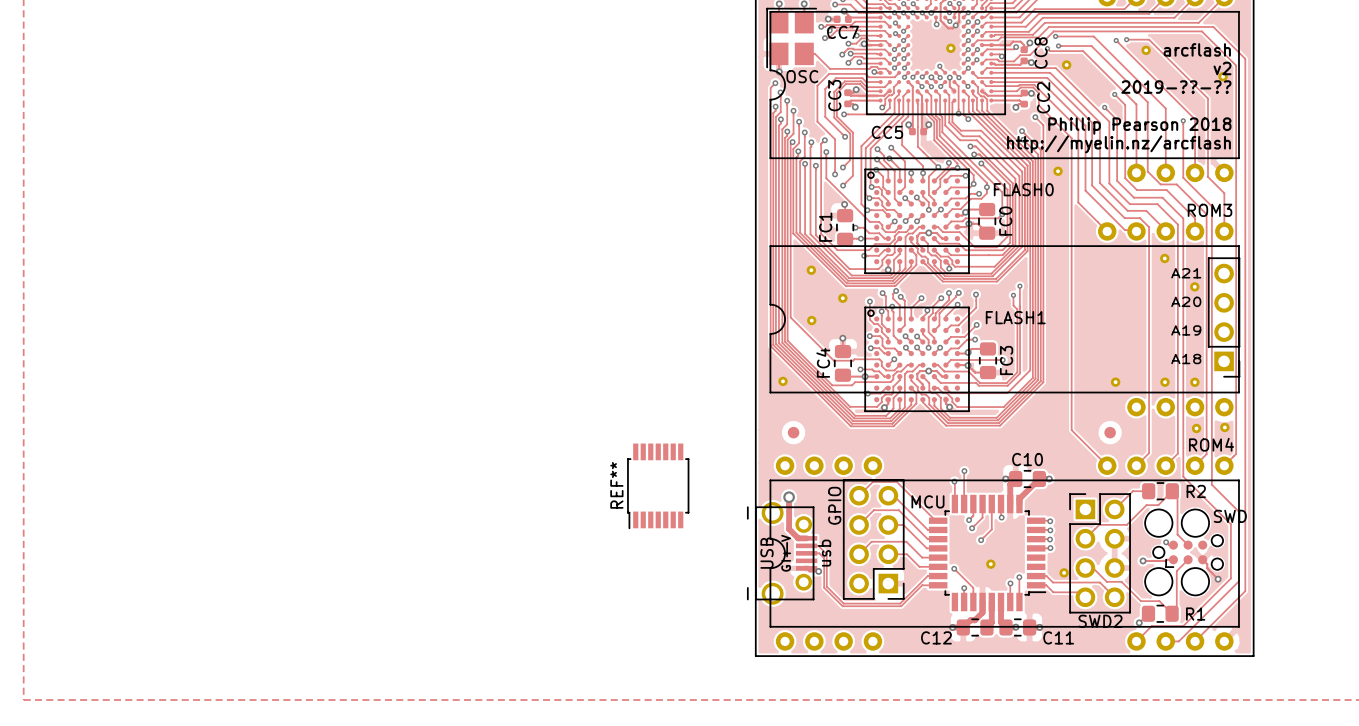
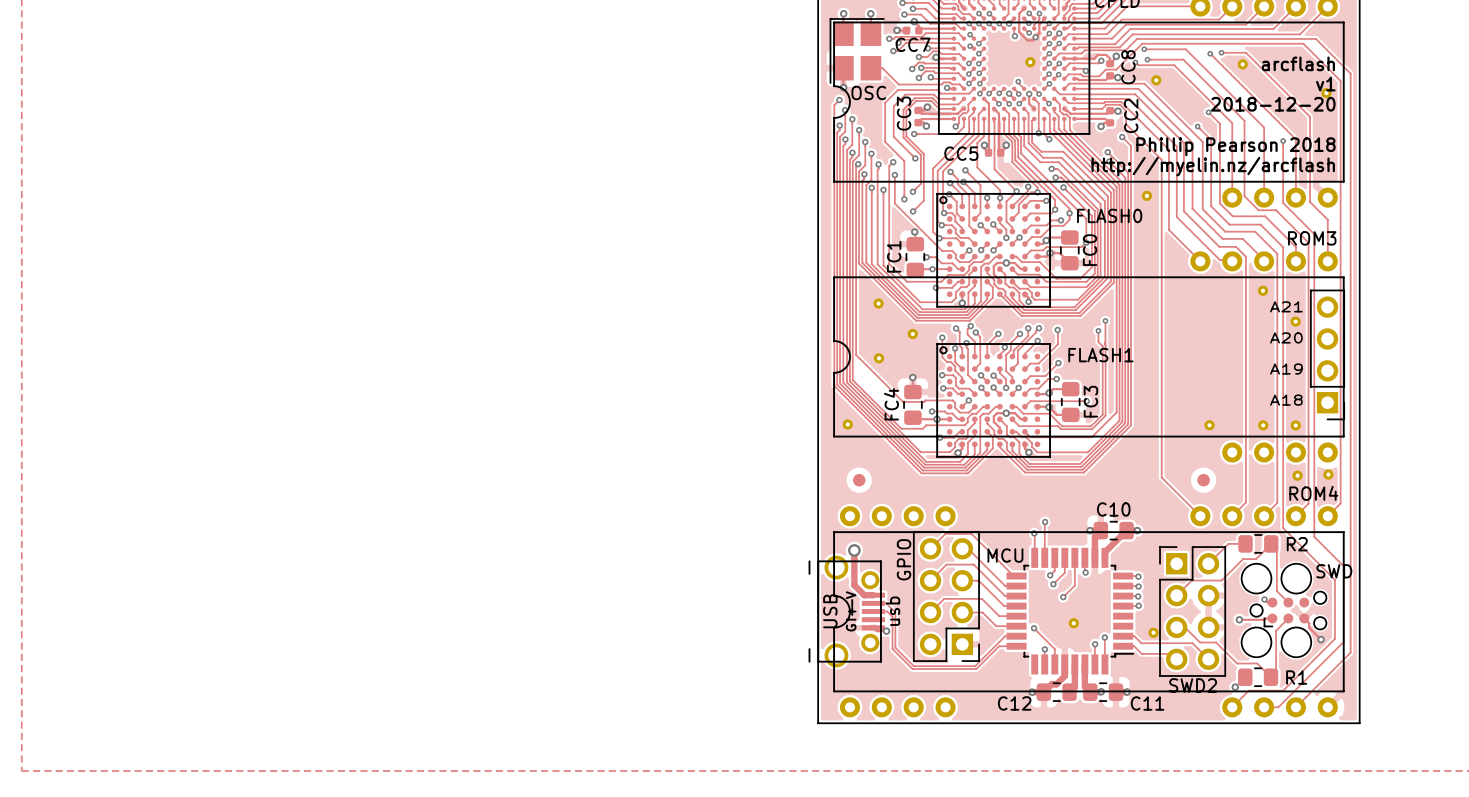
text: v2 (1222, 68) -> v1 (1325, 84)
text: 2019-??-?? (1176, 87) -> 2018-12-20 (1273, 104)
REF**: (658, 486) -> none

